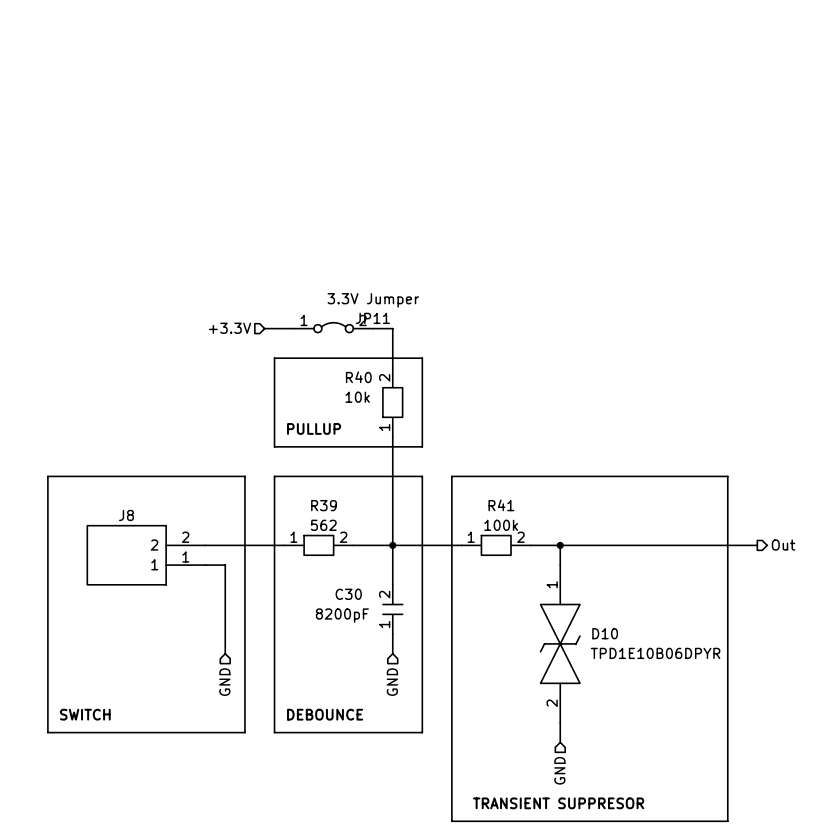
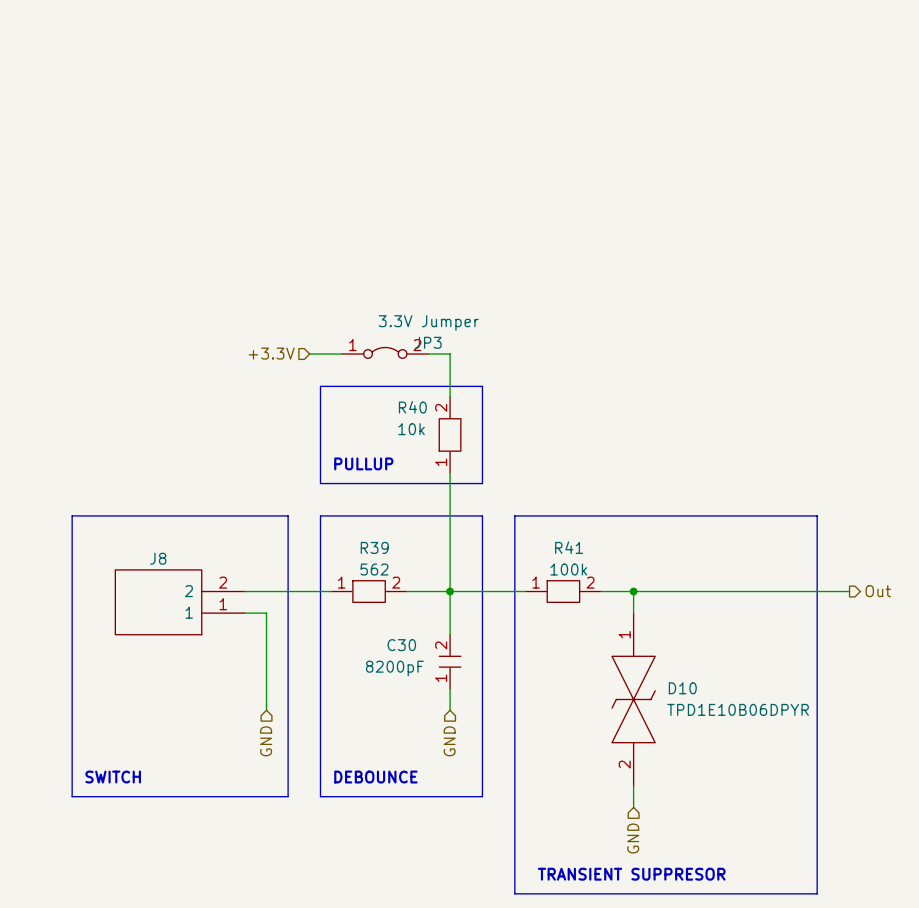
JP11 name: JP11 (372, 318) -> JP3 (428, 342)

